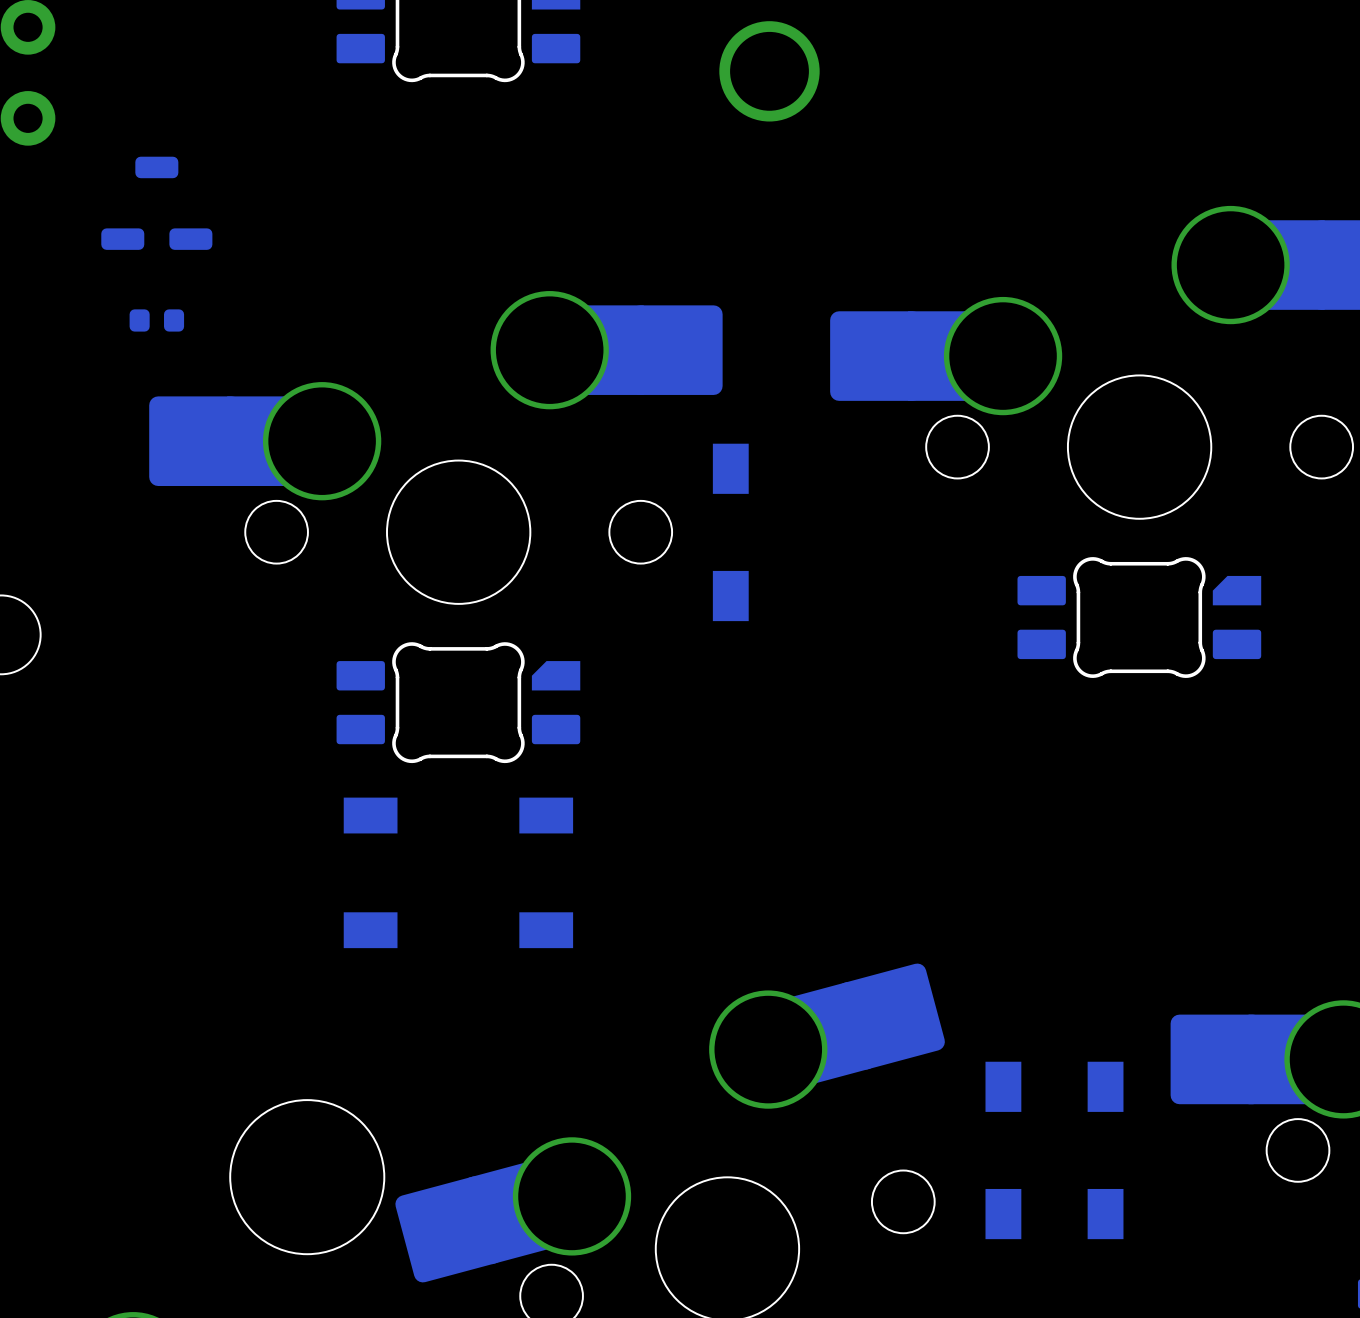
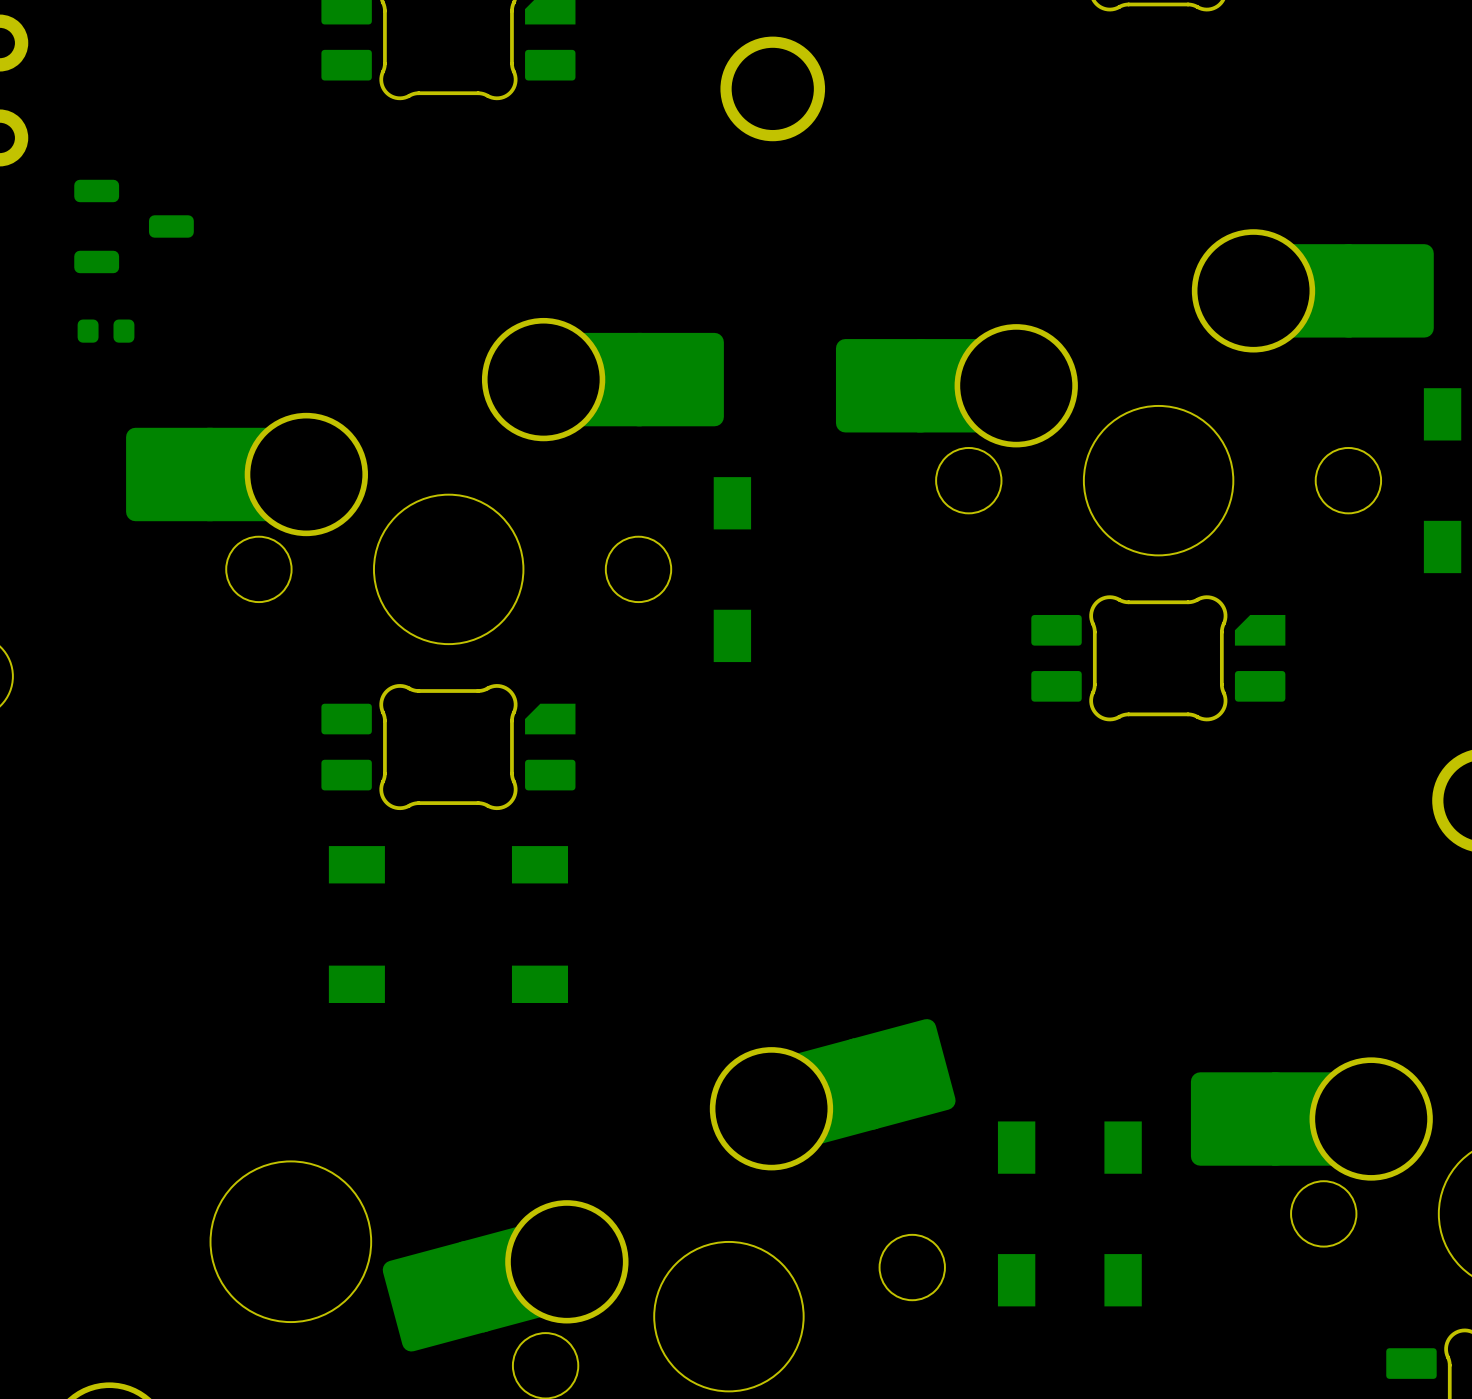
part footprint: [101, 156, 213, 250] -> [74, 179, 194, 274]
part position: (156, 320) -> (106, 331)

